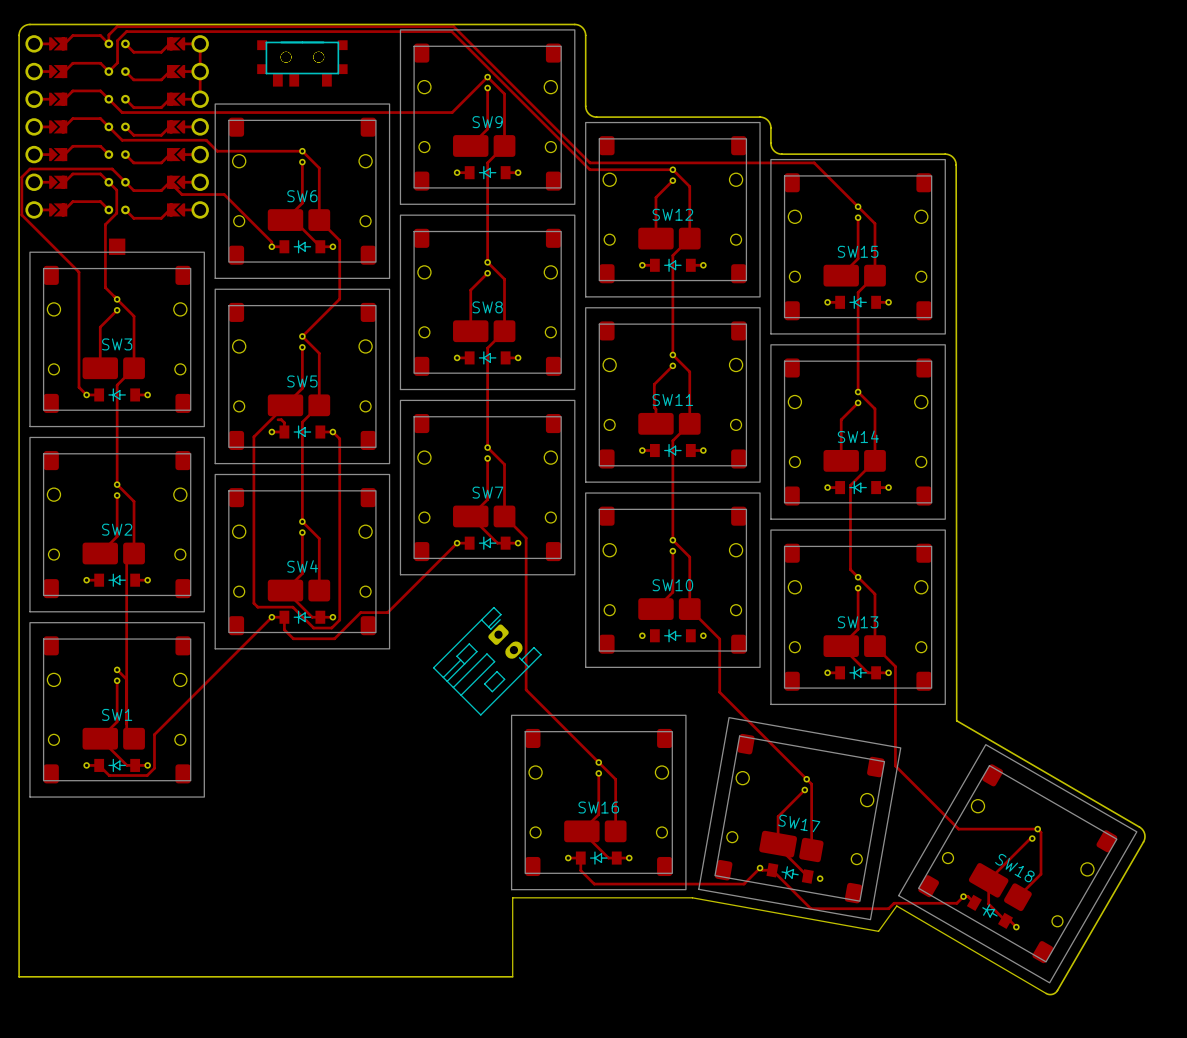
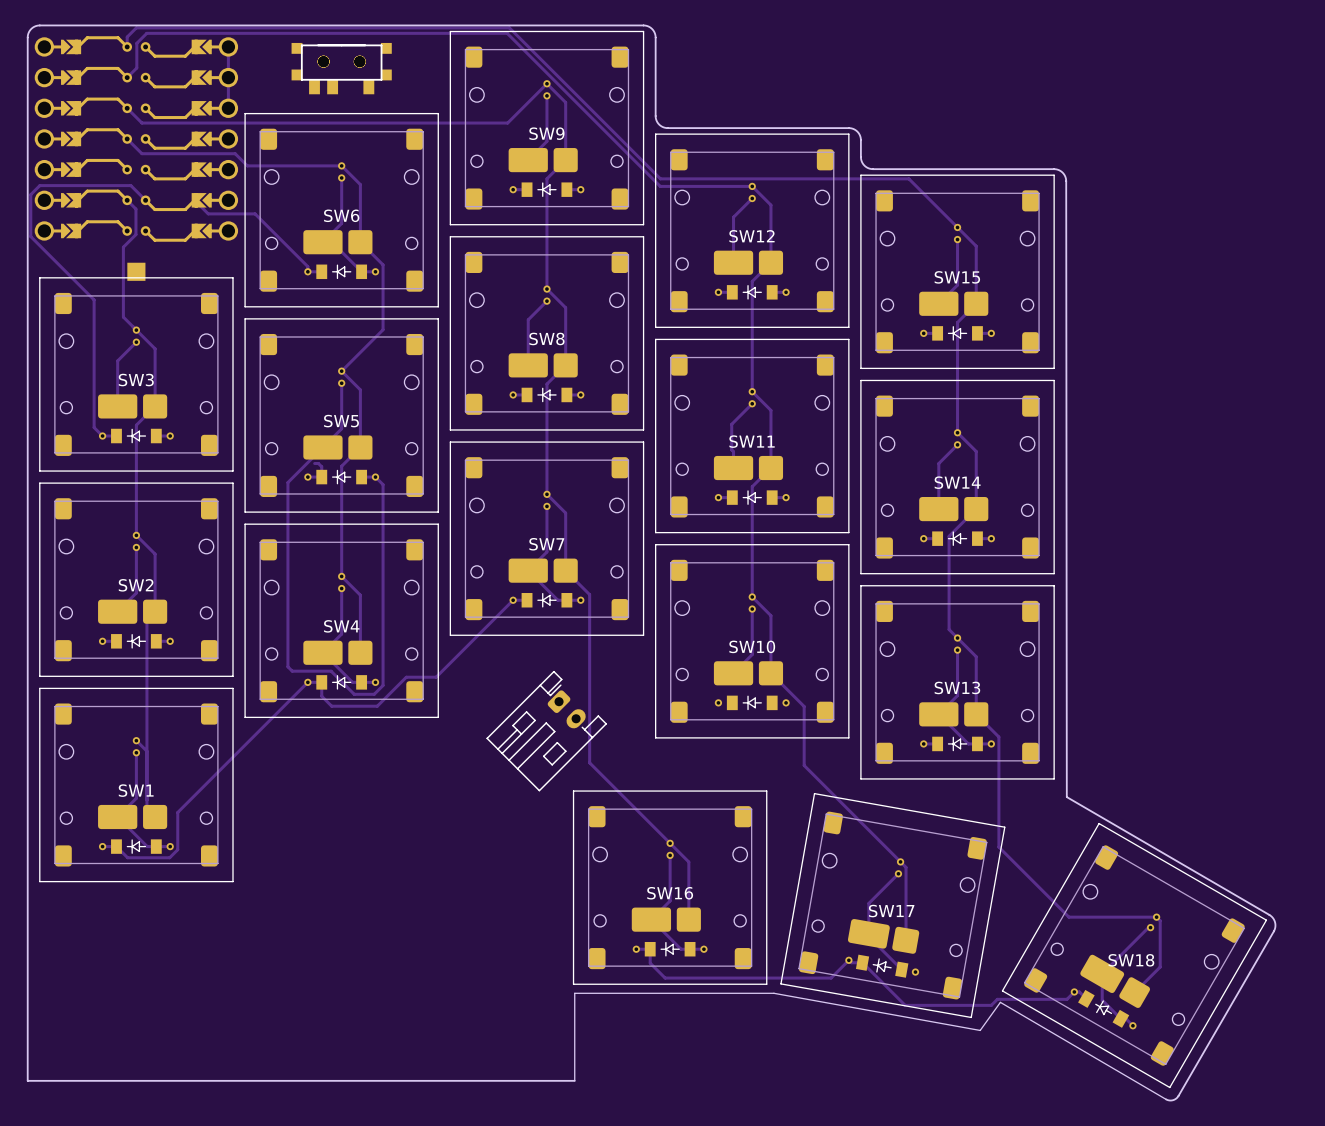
SW9 footprint: [399, 29, 576, 205] -> [449, 30, 645, 226]
SW6 footprint: [214, 103, 391, 279] -> [244, 112, 439, 308]
SW12 footprint: [585, 122, 761, 298] -> [655, 133, 850, 328]
SW15 footprint: [770, 159, 946, 335] -> [860, 174, 1055, 370]
SW8 footprint: [399, 214, 576, 391] -> [449, 236, 645, 431]
SW3 footprint: [29, 251, 205, 428] -> [39, 277, 234, 472]
SW5 footprint: [214, 288, 391, 465] -> [244, 318, 439, 513]
SW11 footprint: [585, 307, 761, 483] -> [655, 338, 850, 534]
SW14 footprint: [770, 344, 946, 520] -> [860, 379, 1055, 575]
SW7 footprint: [399, 399, 576, 576] -> [449, 441, 645, 636]
SW2 footprint: [29, 436, 205, 613] -> [39, 482, 234, 677]
SW4 footprint: [214, 473, 391, 650] -> [244, 523, 439, 718]
SW10 footprint: [585, 492, 761, 668] -> [655, 544, 850, 739]
SW13 footprint: [770, 529, 946, 705] -> [860, 585, 1055, 780]
SW1 footprint: [29, 622, 205, 798] -> [39, 687, 234, 883]
SW16 footprint: [511, 714, 687, 891] -> [572, 790, 768, 985]
SW17 footprint: [698, 717, 902, 921] -> [780, 793, 1006, 1019]
SW18 footprint: [898, 744, 1138, 984] -> [1001, 822, 1268, 1089]

